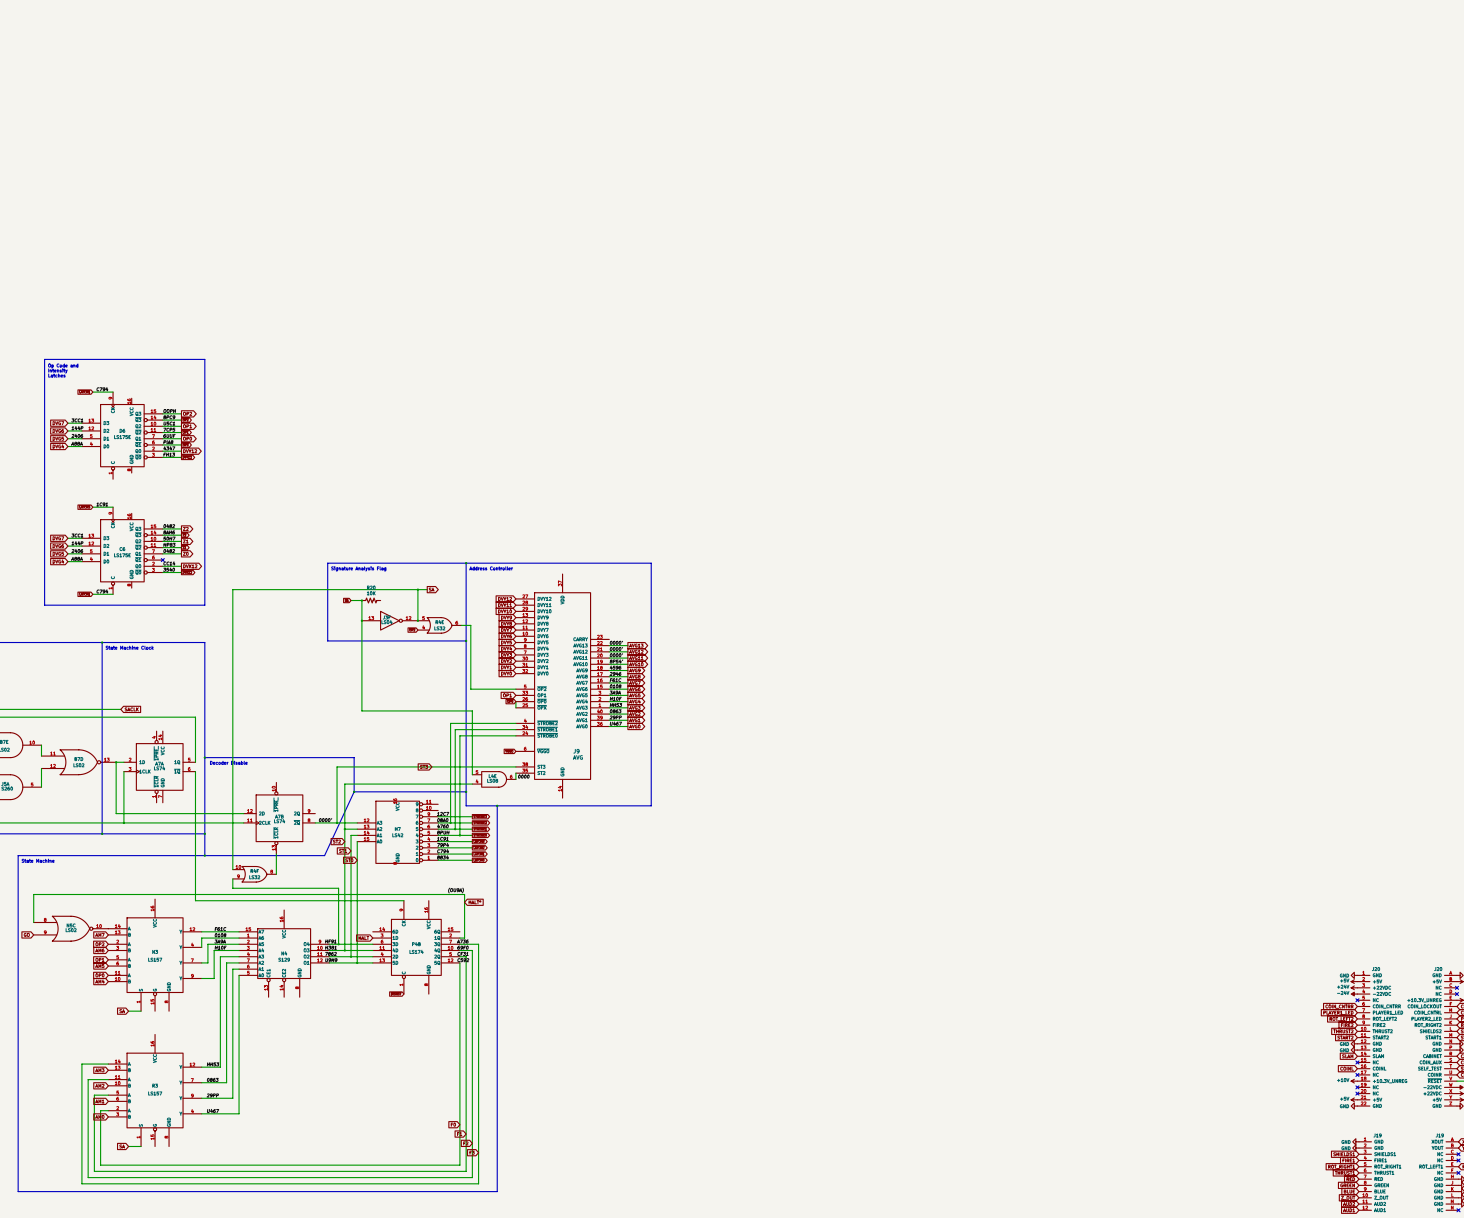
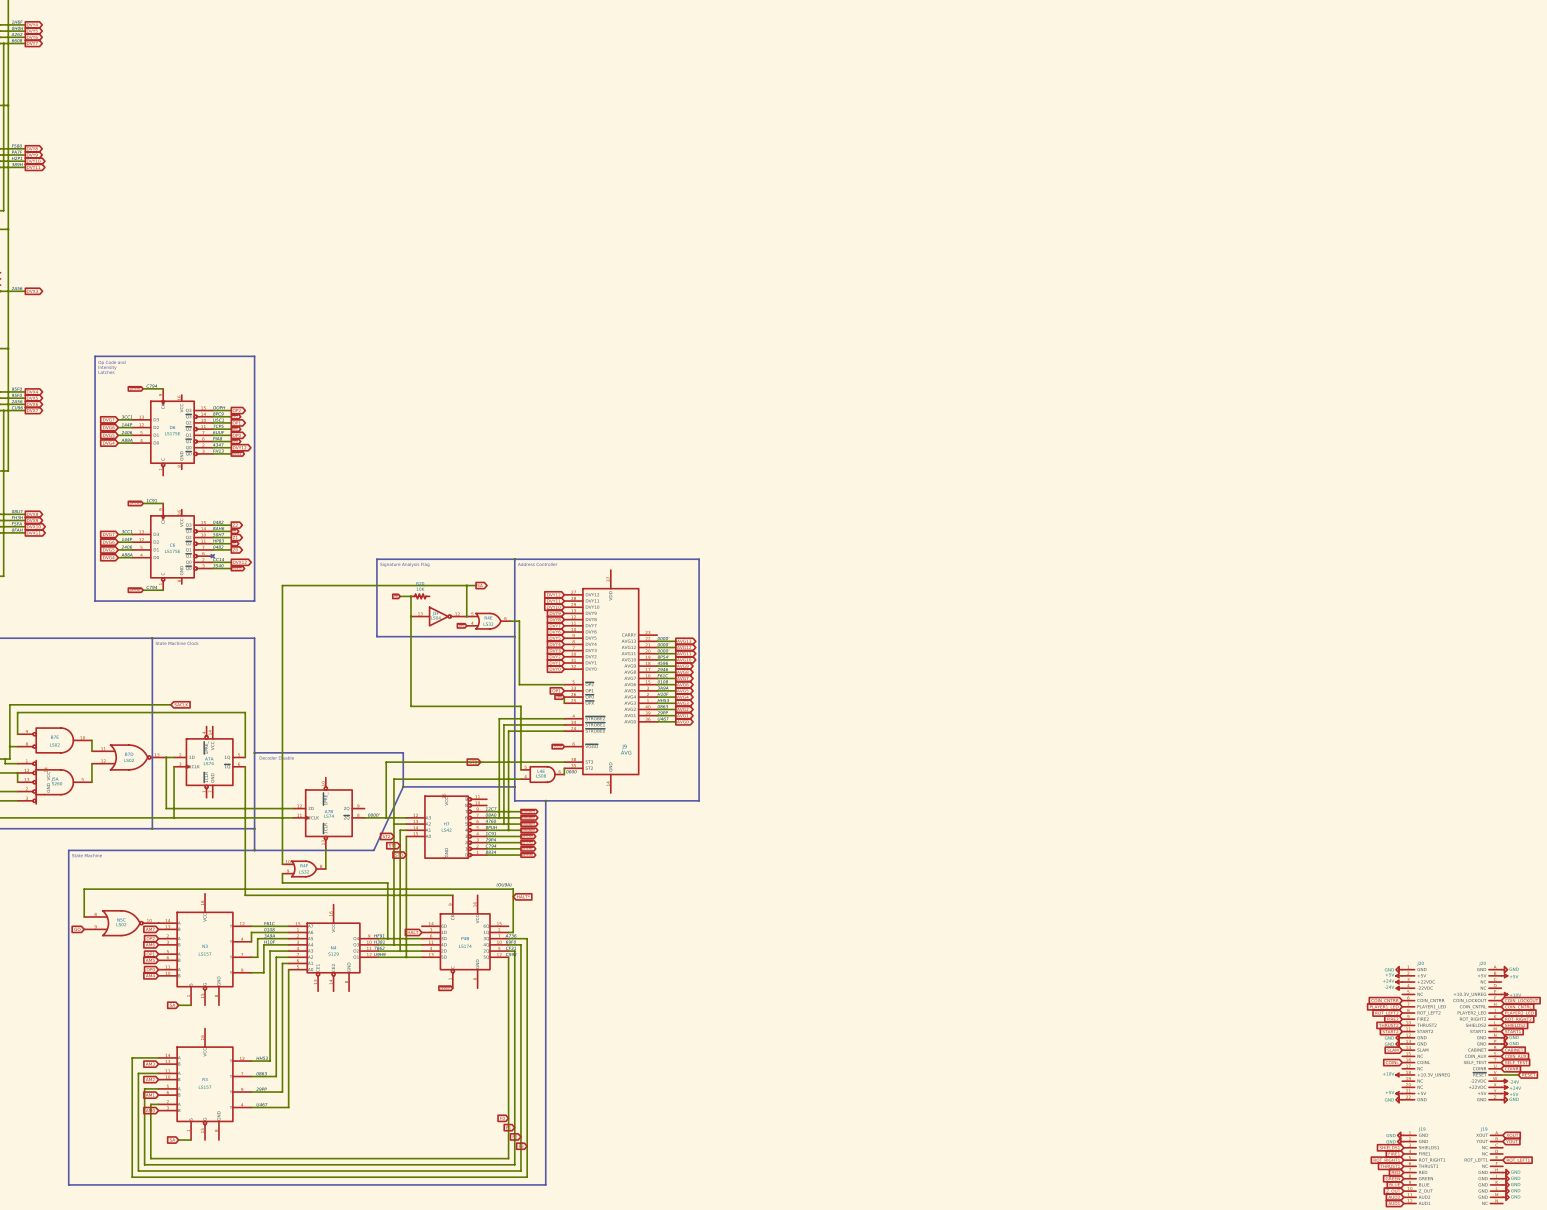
no-connect mark: (1456, 987) -> none
no-connect mark: (1456, 994) -> none
no-connect mark: (1357, 1000) -> none
no-connect mark: (1357, 1062) -> none
no-connect mark: (1357, 1074) -> none
no-connect mark: (1357, 1087) -> none
no-connect mark: (1357, 1093) -> none
no-connect mark: (1458, 1154) -> none
no-connect mark: (1458, 1160) -> none
no-connect mark: (1458, 1172) -> none
no-connect mark: (1458, 1210) -> none

